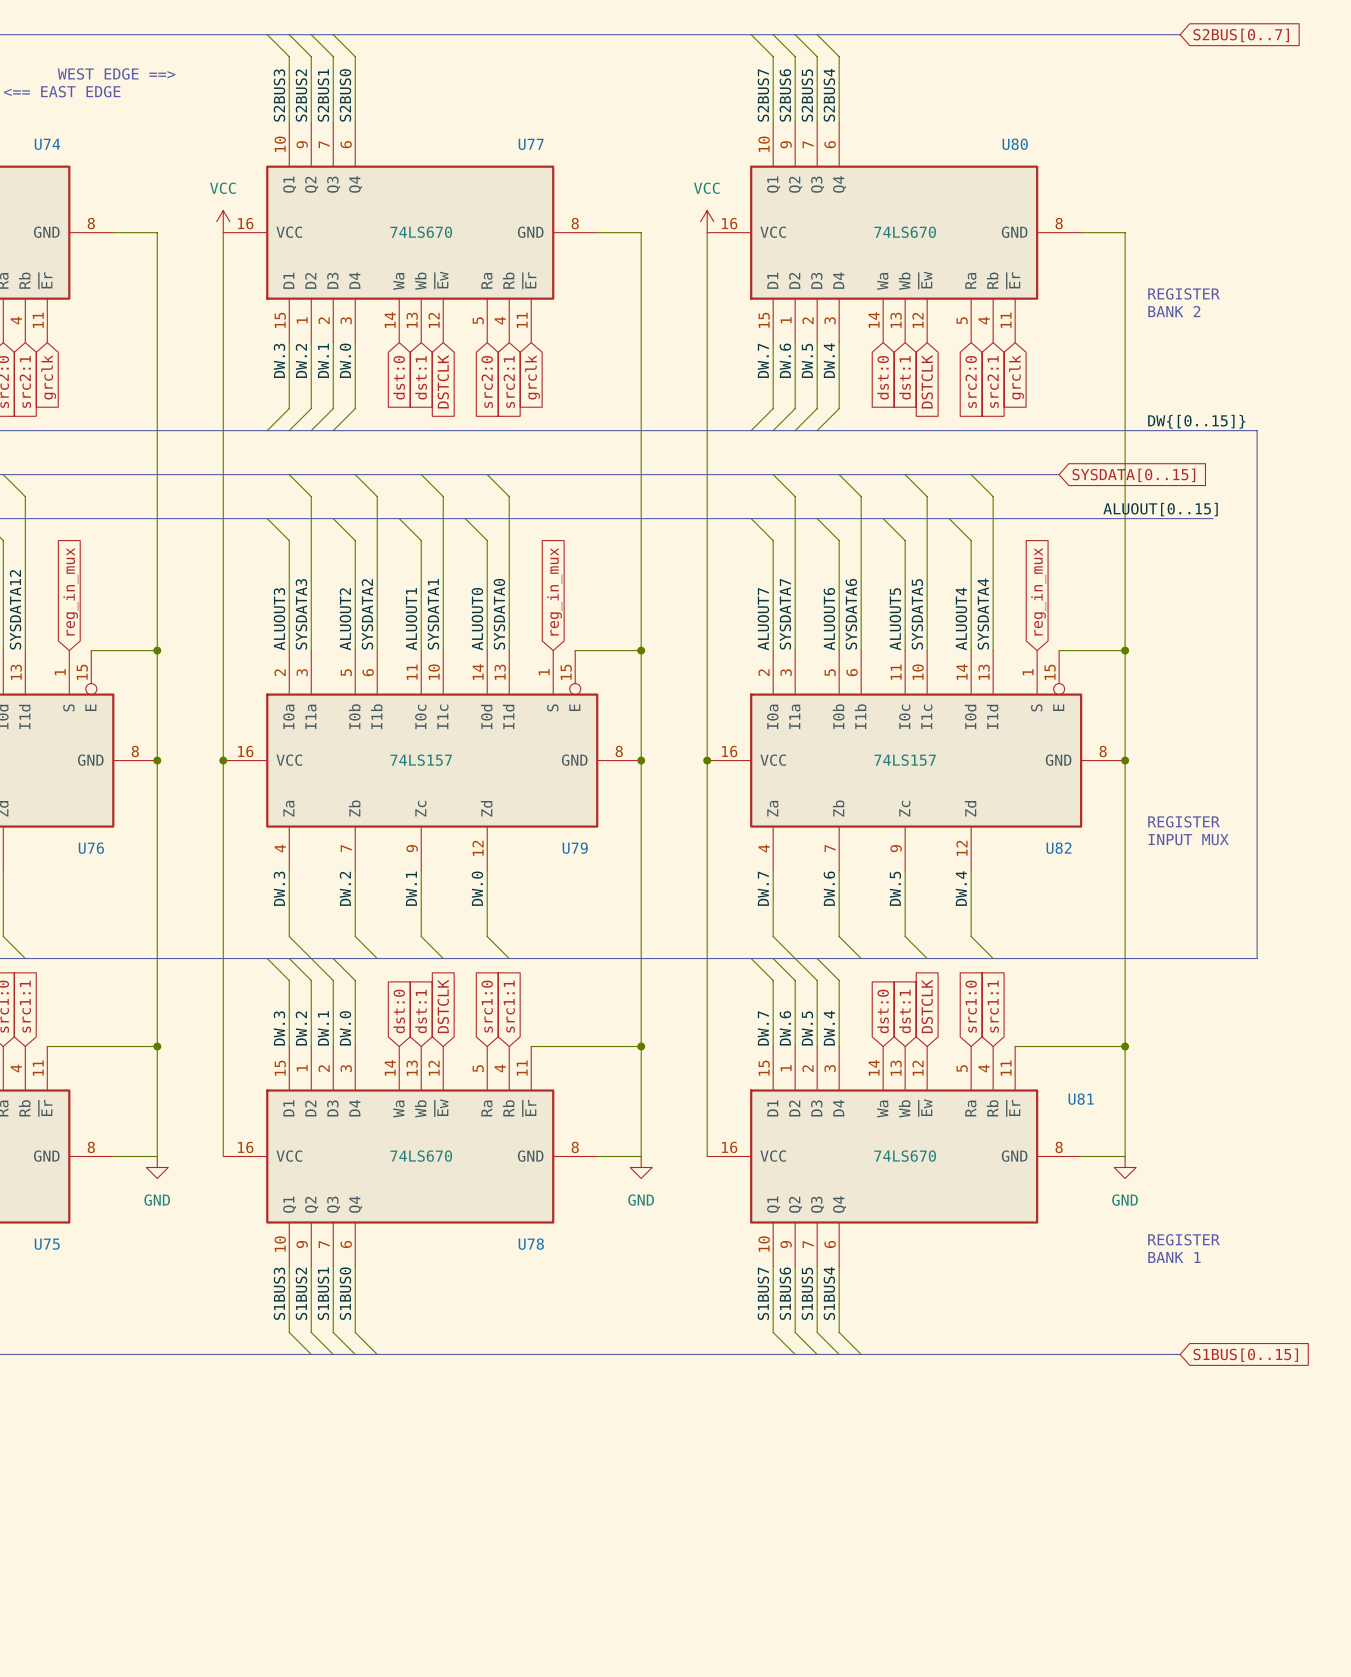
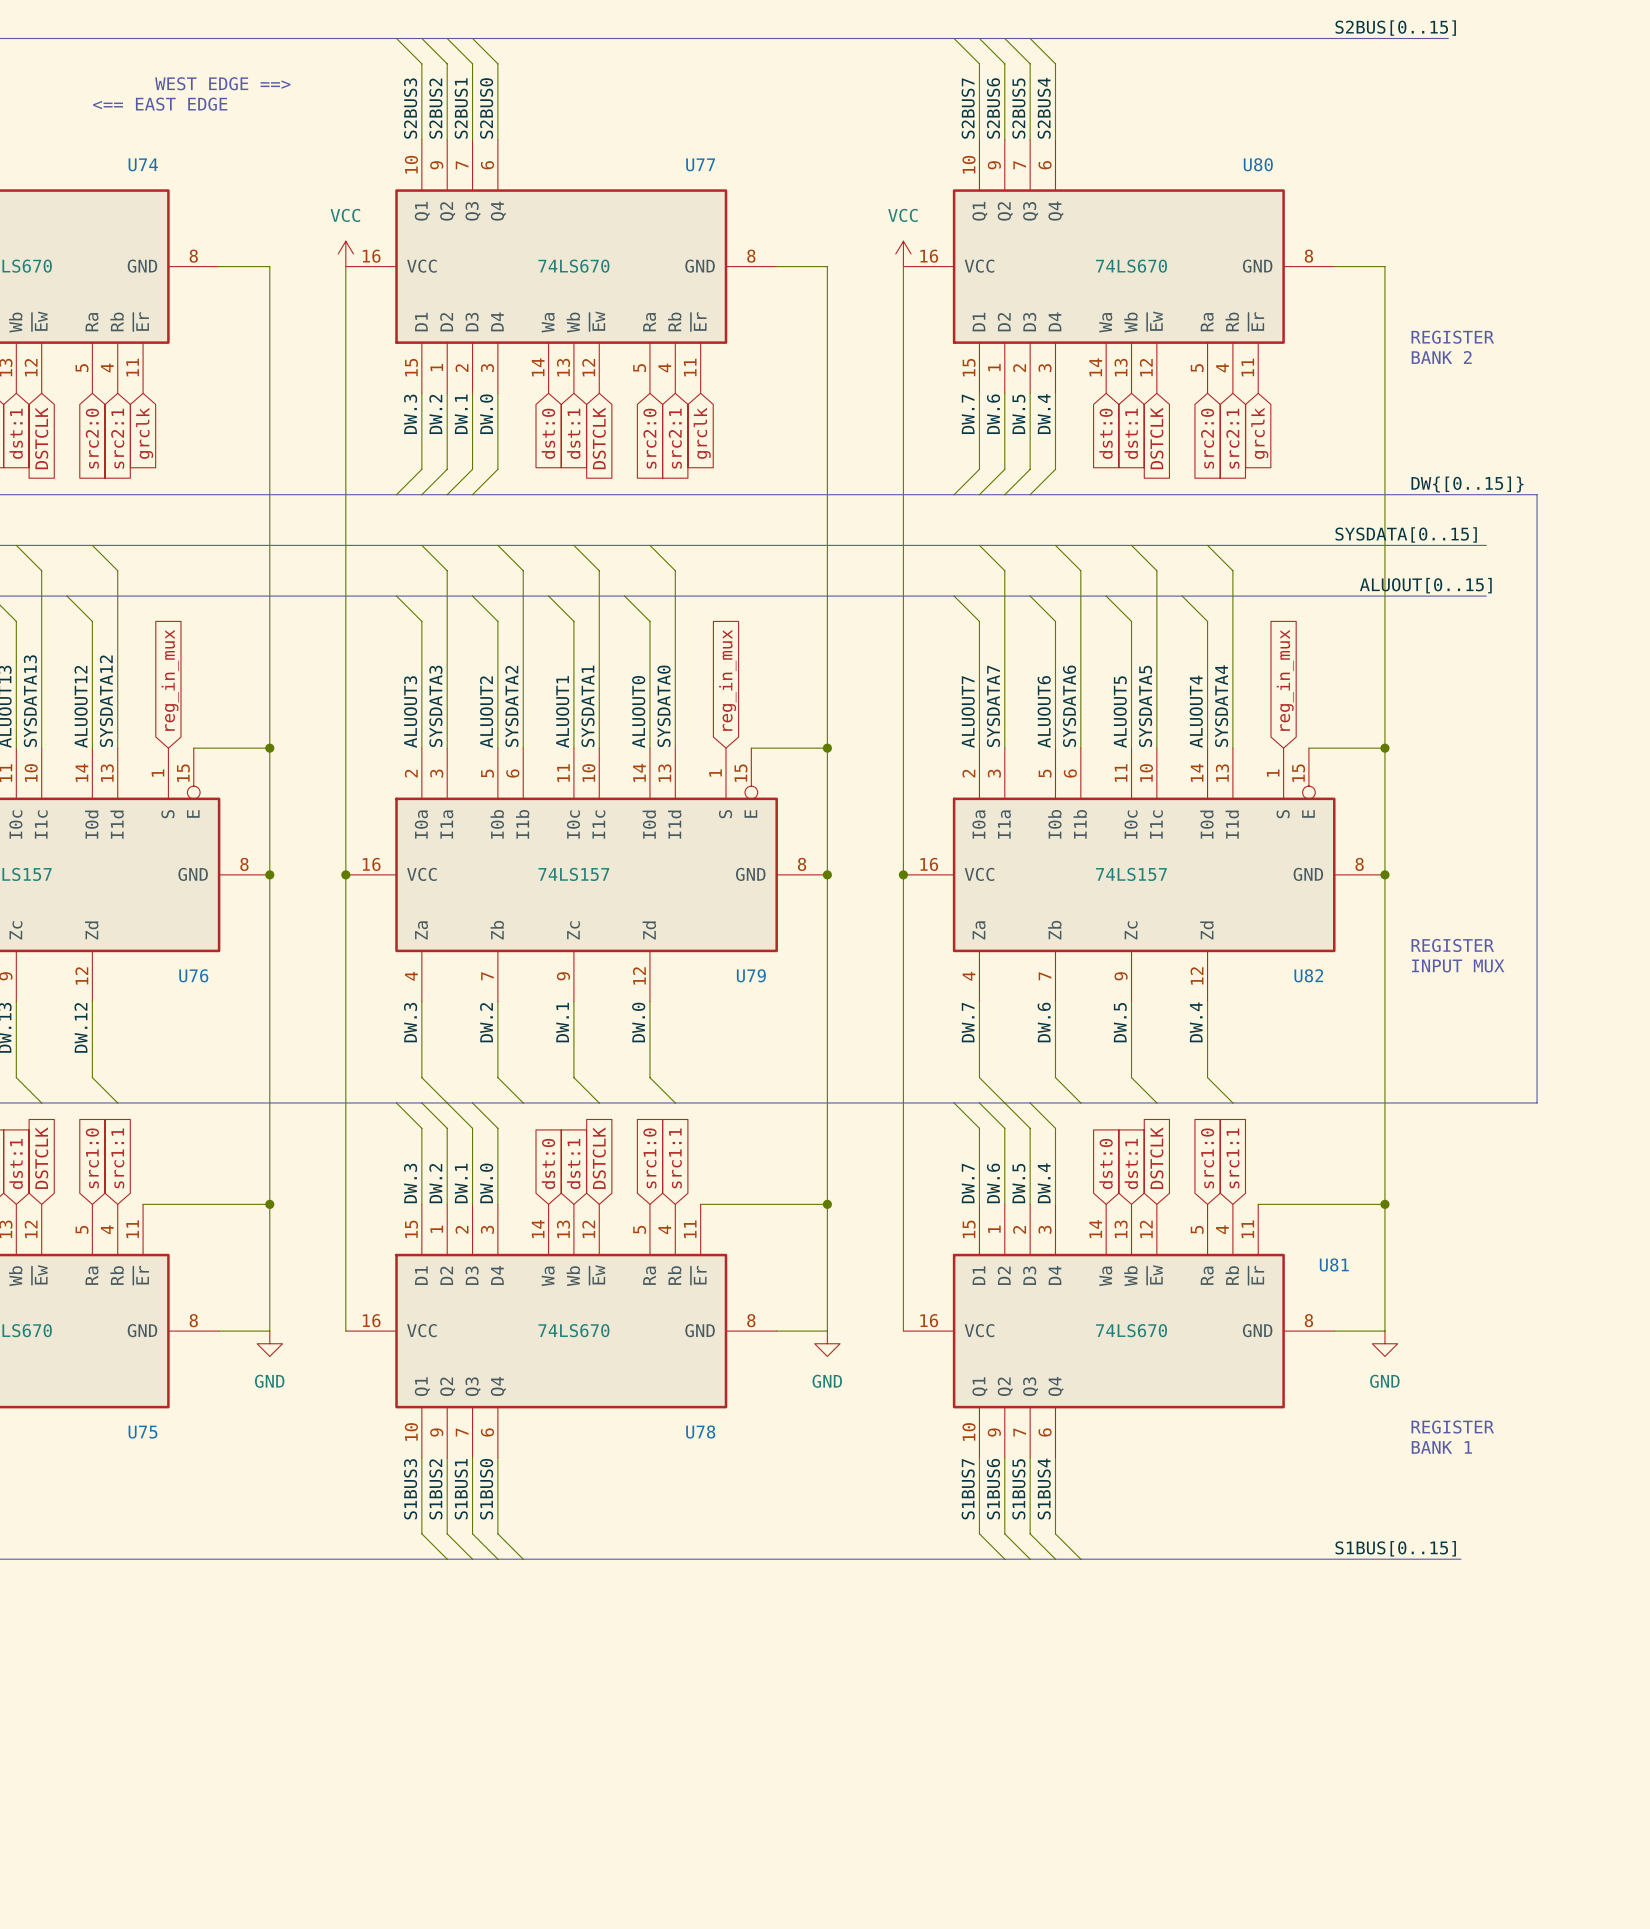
label: none -> S2BUS[0..15] (1395, 28)
global label: S2BUS[0..7] (1241, 35) -> none
label: none -> SYSDATA[0..15] (1406, 534)
bus: none -> (1308, 545) (1486, 545)
global label: SYSDATA[0..15] (1133, 475) -> none
label: none -> S1BUS[0..15] (1395, 1548)
bus: none -> (1448, 1559) (1461, 1559)
global label: S1BUS[0..15] (1245, 1355) -> none

